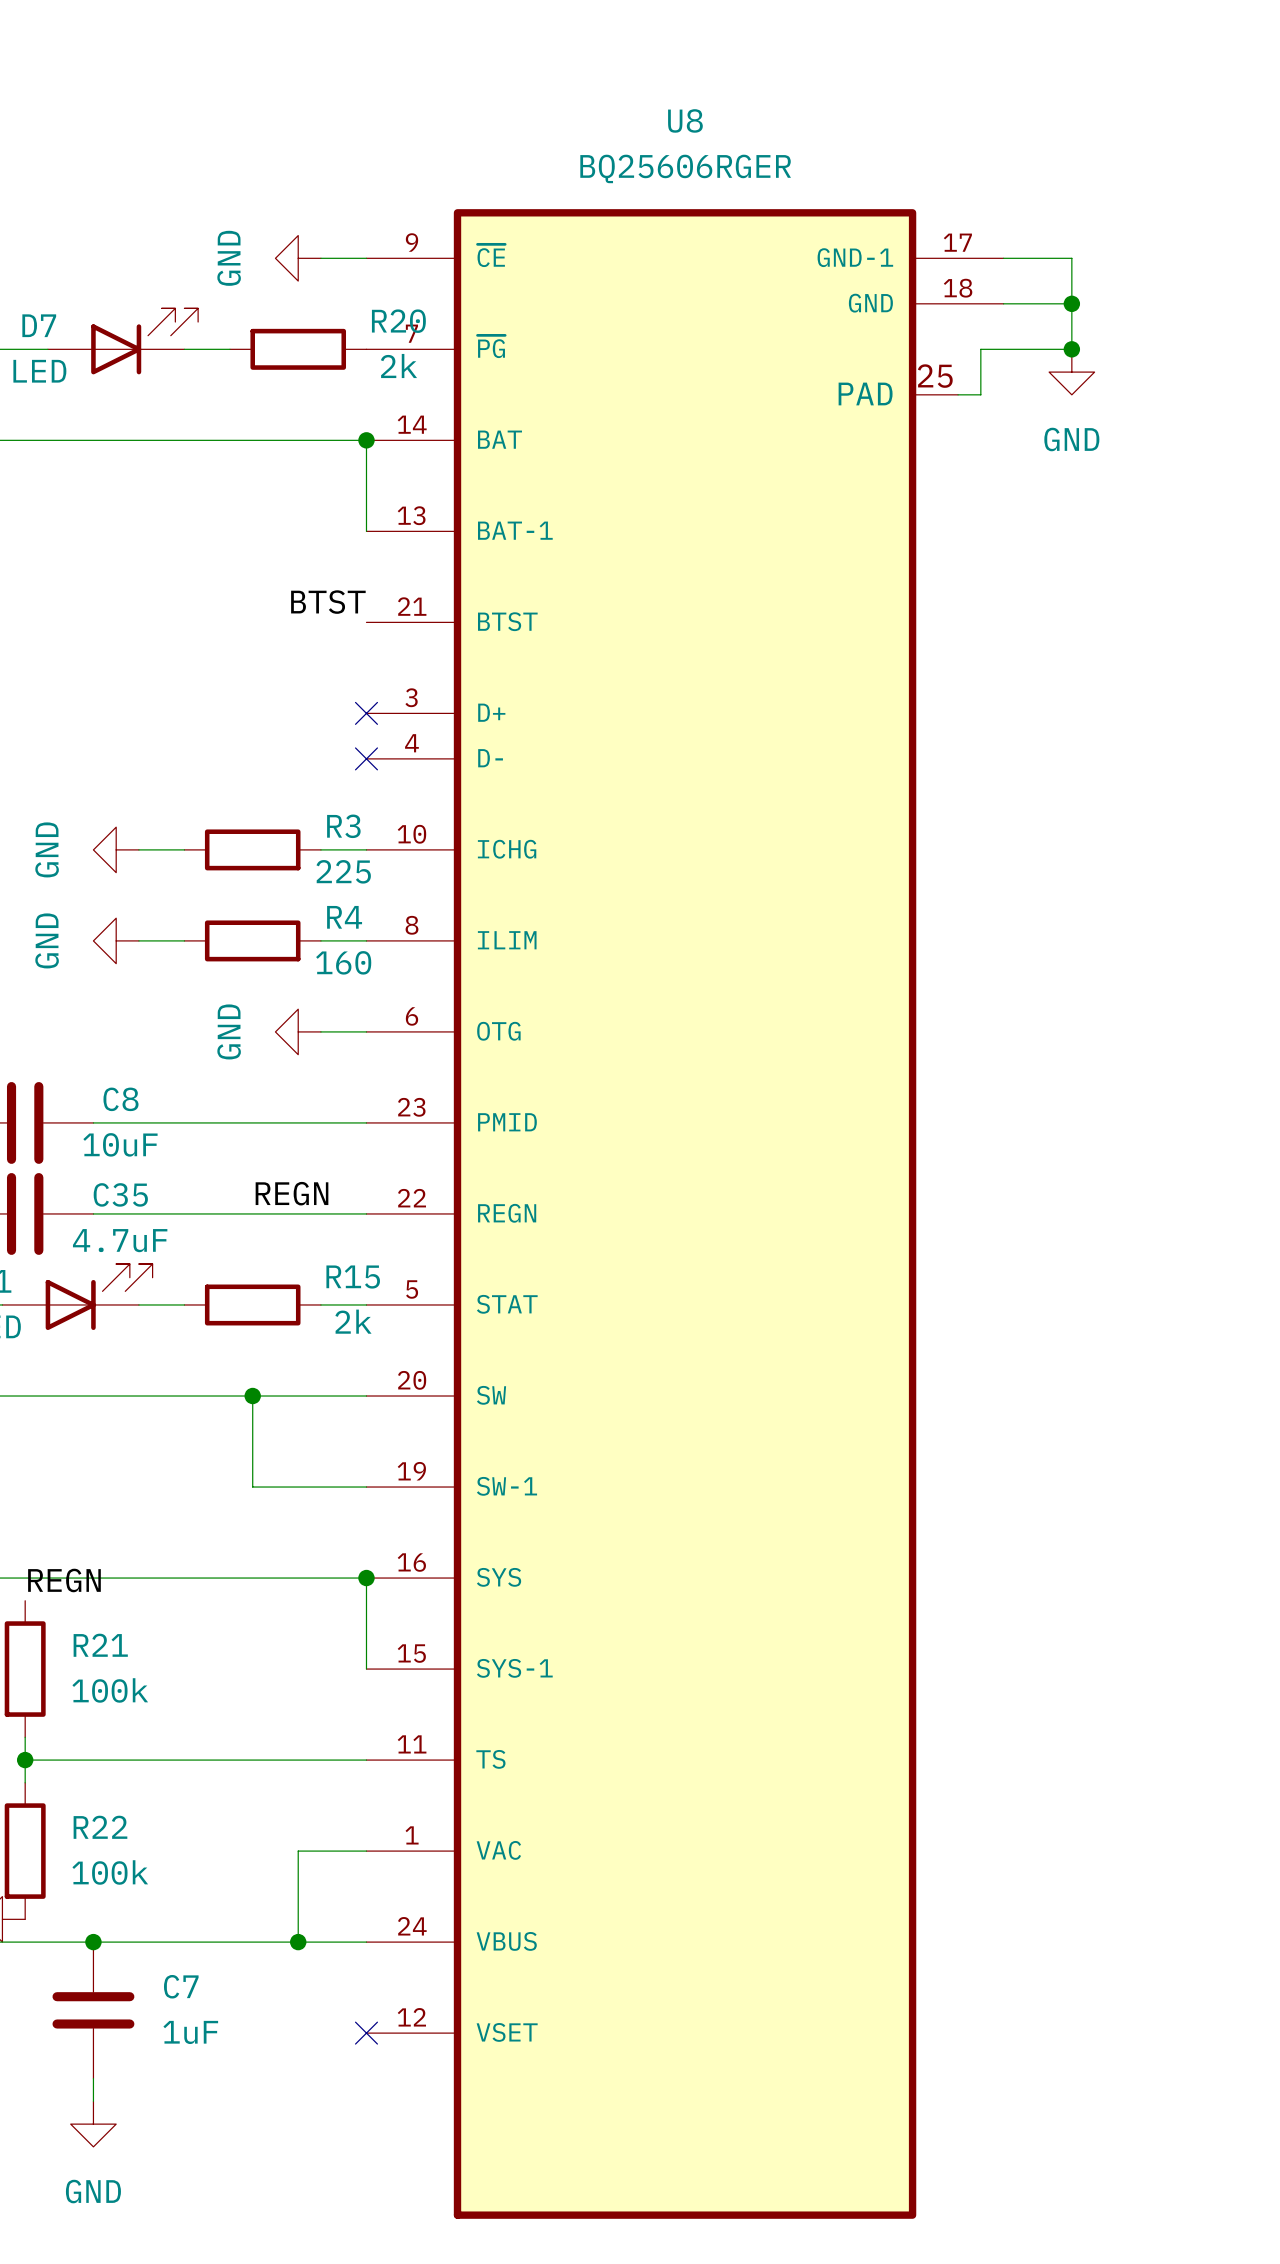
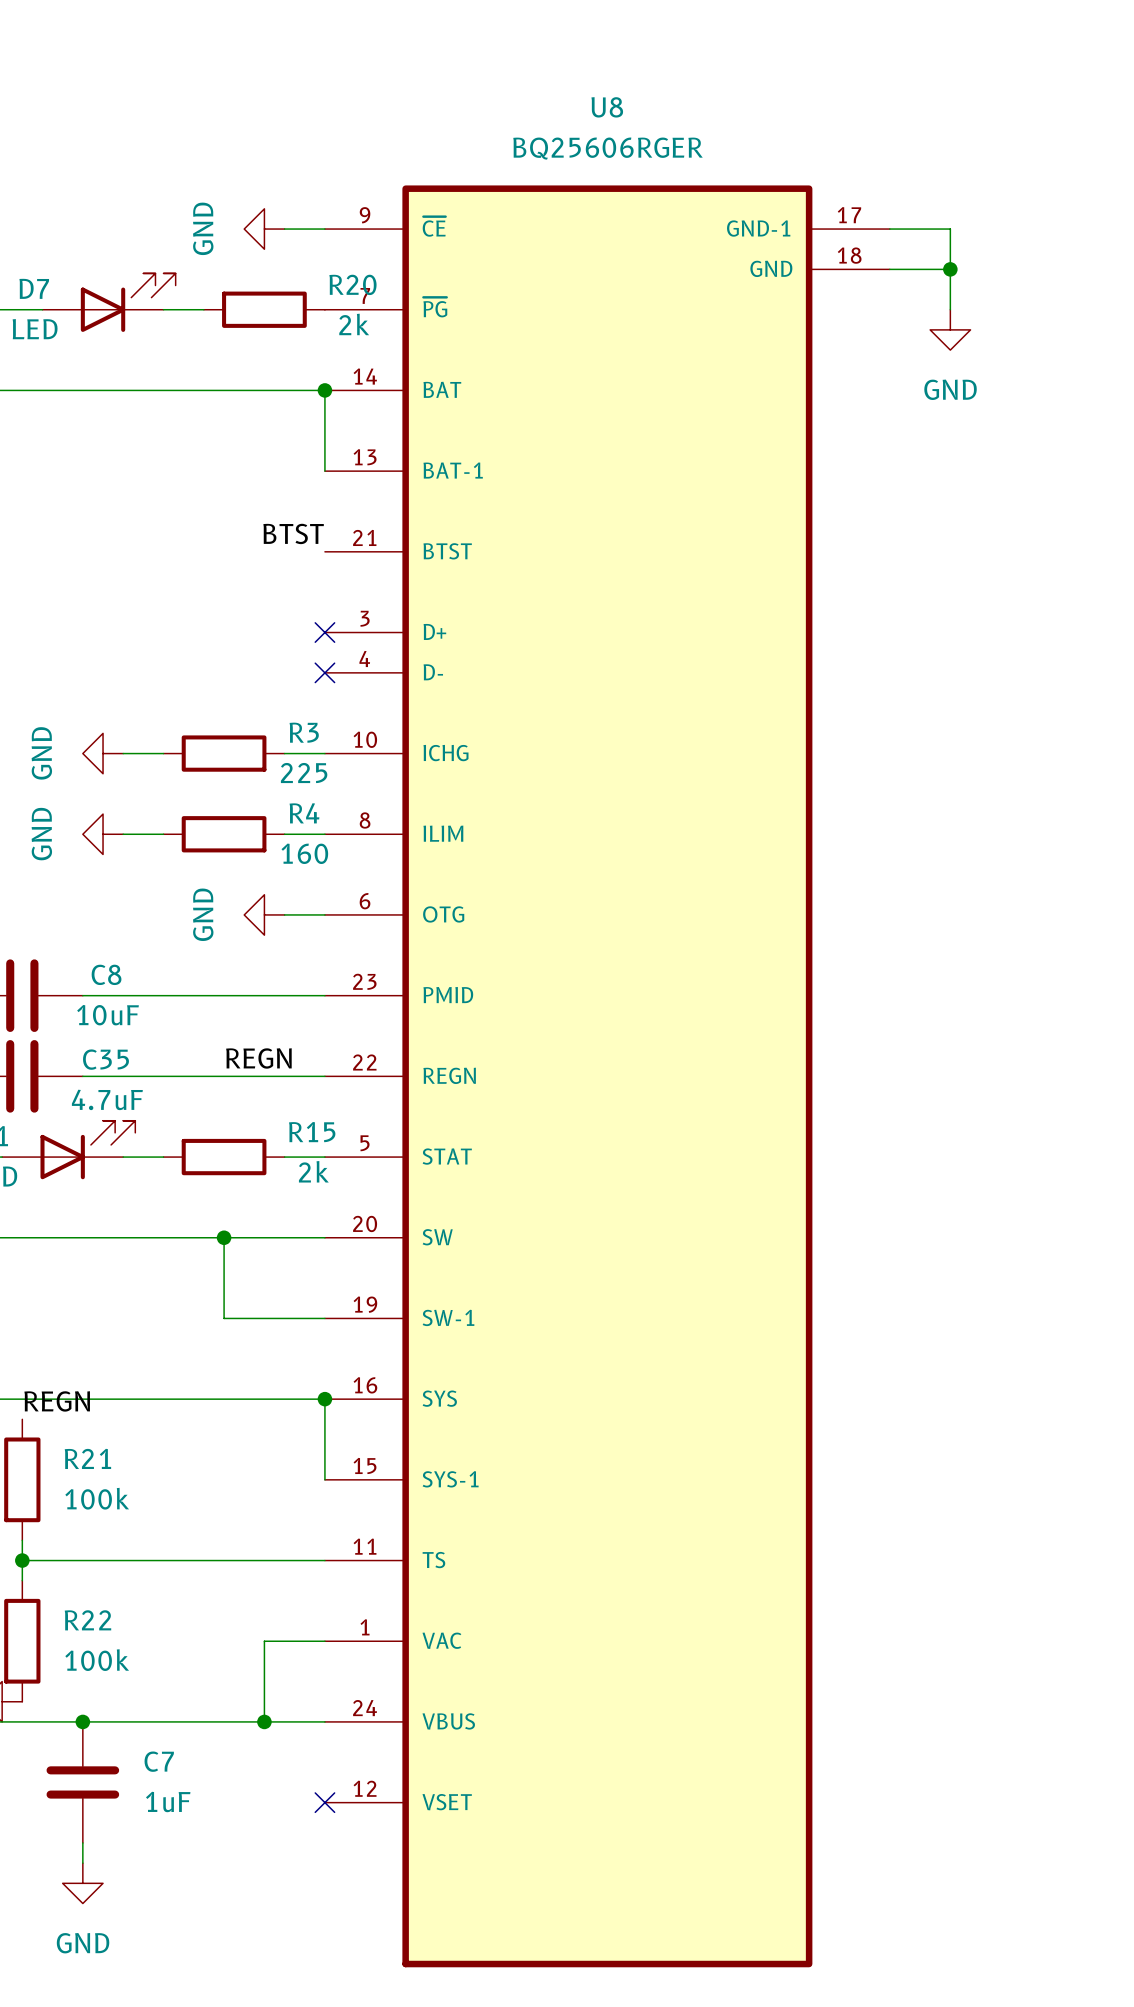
U8 symbol: [366, 209, 1004, 2219] -> [324, 185, 890, 1968]
wire: (1071, 349) (980, 349) (980, 394) (958, 394) -> none
junction: (1071, 349) -> none

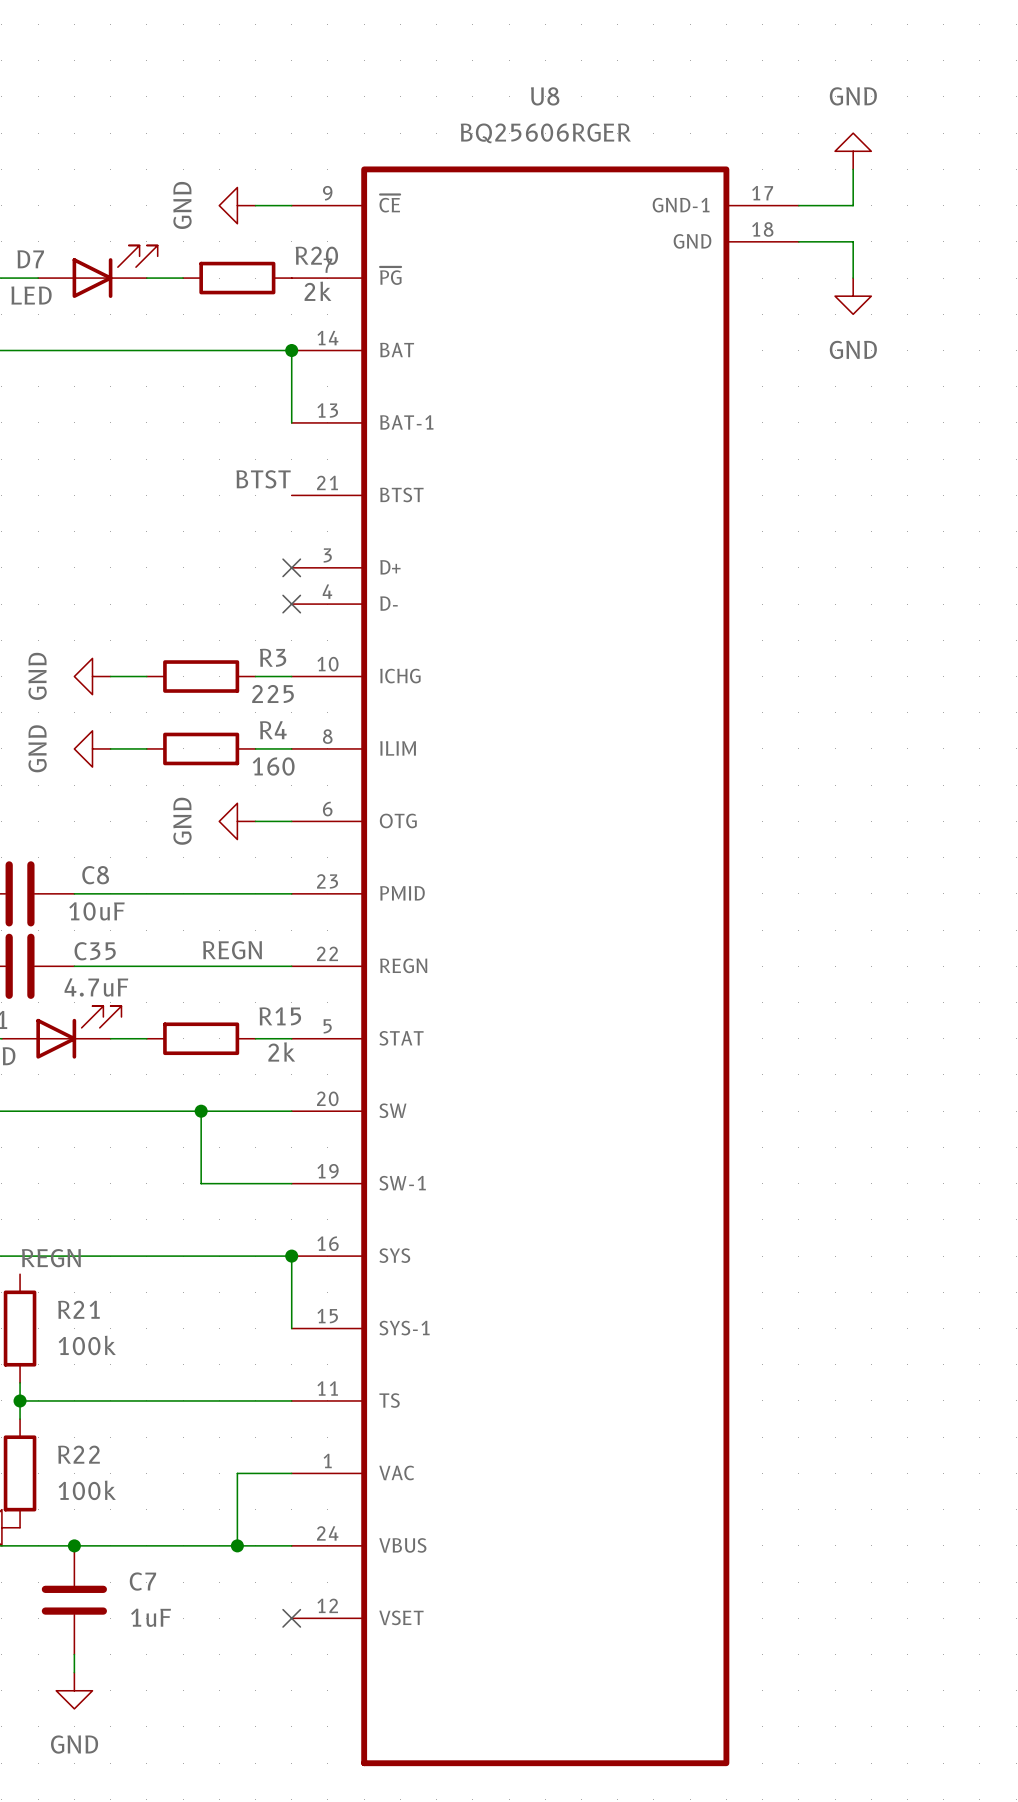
power symbol: none -> GND (853, 151)
wire: (950, 229) (950, 269) -> (853, 205) (853, 169)
junction: (950, 269) -> none

